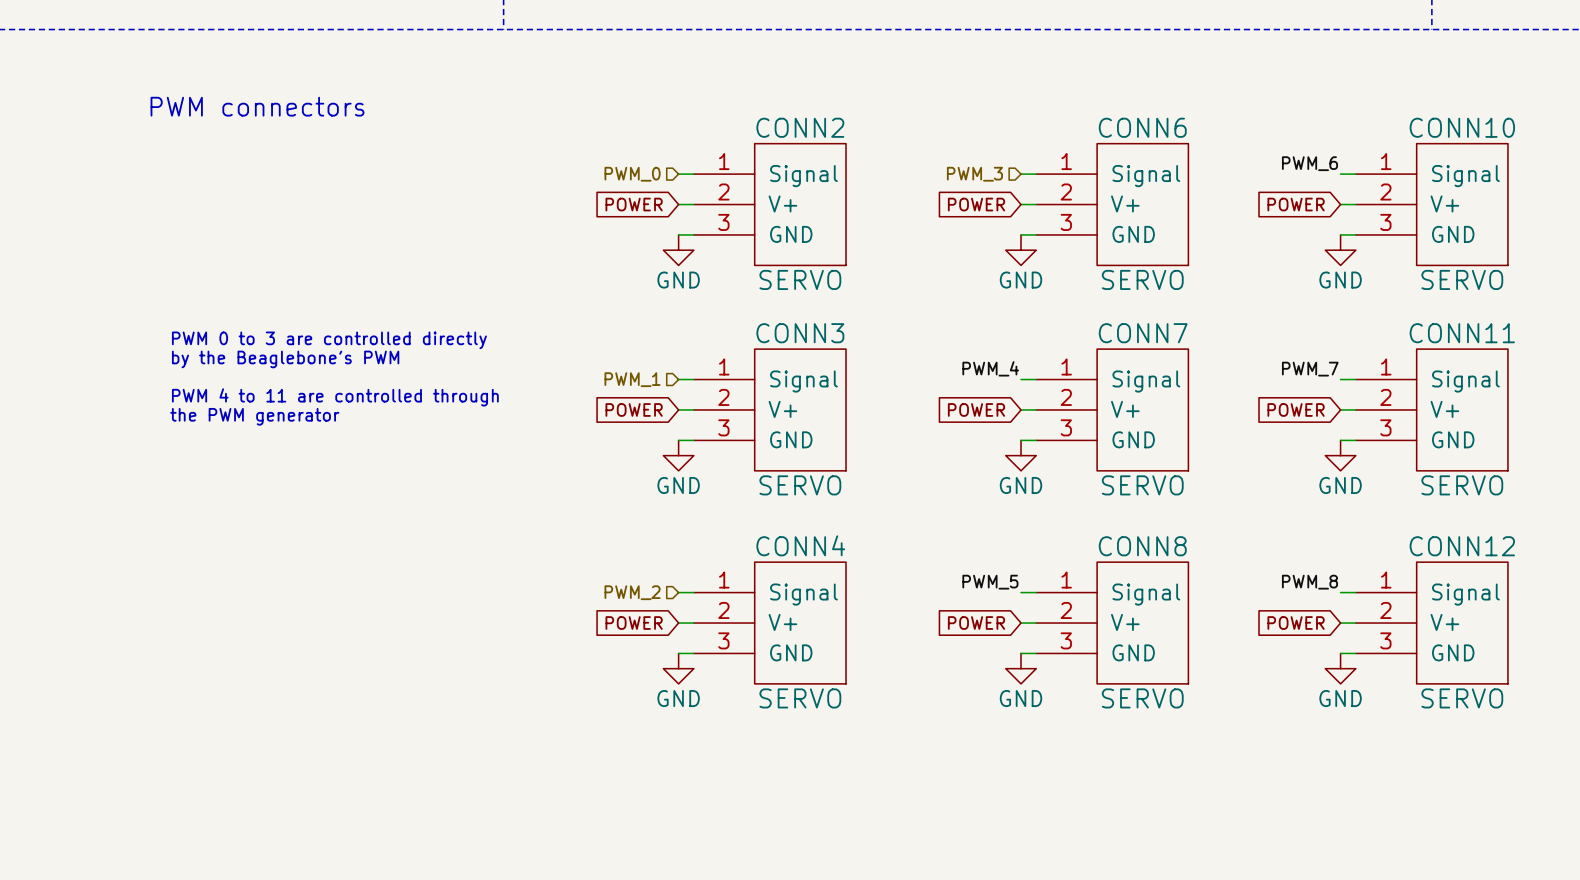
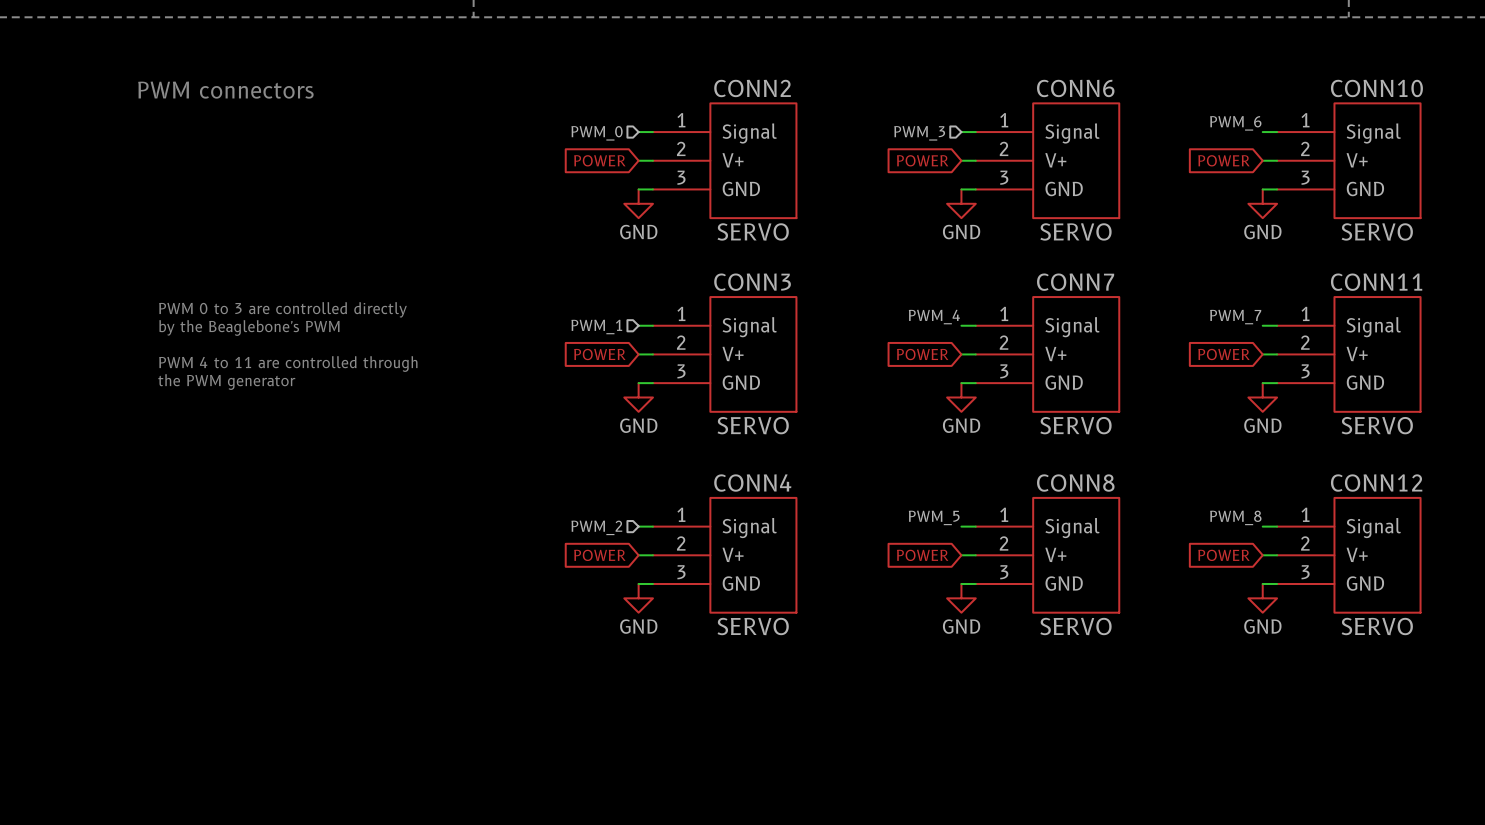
label position: PWM_6 (1309, 163) -> PWM_6 (1235, 123)
hierarchical label position: PWM_0 (632, 174) -> PWM_0 (597, 133)
wire: (678, 174) (693, 174) -> (638, 132) (652, 132)
hierarchical label position: PWM_3 (974, 174) -> PWM_3 (919, 133)
wire: (1021, 174) (1036, 174) -> (961, 132) (975, 132)
wire: (1340, 174) (1355, 174) -> (1262, 132) (1277, 132)
global label position: POWER (634, 204) -> POWER (599, 160)
wire: (678, 204) (693, 204) -> (638, 160) (652, 160)
CONN2 position: (769, 204) -> (724, 160)
global label position: POWER (976, 204) -> POWER (922, 160)
wire: (1021, 204) (1036, 204) -> (961, 160) (975, 160)
CONN6 position: (1112, 204) -> (1047, 160)
global label position: POWER (1296, 204) -> POWER (1223, 160)
wire: (1340, 204) (1355, 204) -> (1262, 160) (1277, 160)
CONN10 position: (1431, 204) -> (1348, 160)
wire: (678, 234) (693, 234) -> (638, 189) (652, 189)
wire: (1021, 234) (1036, 234) -> (961, 189) (975, 189)
wire: (1340, 234) (1355, 234) -> (1262, 189) (1277, 189)
power symbol position: GND (678, 250) -> GND (638, 203)
power symbol position: GND (1021, 250) -> GND (961, 203)
power symbol position: GND (1340, 250) -> GND (1262, 203)
label position: PWM_4 (990, 368) -> PWM_4 (934, 317)
label position: PWM_7 (1310, 369) -> PWM_7 (1235, 317)
hierarchical label position: PWM_1 (632, 379) -> PWM_1 (596, 327)
wire: (678, 379) (693, 379) -> (638, 325) (652, 325)
wire: (1021, 379) (1036, 379) -> (961, 325) (975, 325)
wire: (1340, 379) (1355, 379) -> (1262, 325) (1277, 325)
global label position: POWER (634, 409) -> POWER (599, 354)
wire: (678, 409) (693, 409) -> (638, 354) (652, 354)
CONN3 position: (769, 409) -> (724, 354)
global label position: POWER (976, 409) -> POWER (922, 354)
wire: (1021, 409) (1036, 409) -> (961, 354) (975, 354)
CONN7 position: (1112, 409) -> (1047, 354)
global label position: POWER (1296, 409) -> POWER (1223, 354)
wire: (1340, 409) (1355, 409) -> (1262, 354) (1277, 354)
CONN11 position: (1431, 409) -> (1348, 354)
wire: (678, 440) (693, 440) -> (638, 383) (652, 383)
wire: (1021, 440) (1036, 440) -> (961, 383) (975, 383)
wire: (1340, 440) (1355, 440) -> (1262, 383) (1277, 383)
power symbol position: GND (678, 455) -> GND (638, 397)
power symbol position: GND (1021, 455) -> GND (961, 397)
power symbol position: GND (1340, 455) -> GND (1262, 397)
label position: PWM_5 (990, 582) -> PWM_5 (934, 517)
label position: PWM_8 (1309, 582) -> PWM_8 (1235, 517)
hierarchical label position: PWM_2 (632, 592) -> PWM_2 (596, 527)
wire: (678, 592) (693, 592) -> (638, 526) (652, 526)
wire: (1021, 592) (1036, 592) -> (961, 526) (975, 526)
wire: (1340, 592) (1355, 592) -> (1262, 526) (1277, 526)
global label position: POWER (634, 623) -> POWER (599, 555)
wire: (678, 623) (693, 623) -> (638, 555) (652, 555)
CONN4 position: (769, 623) -> (724, 555)
global label position: POWER (976, 623) -> POWER (922, 555)
wire: (1021, 623) (1036, 623) -> (961, 555) (975, 555)
CONN8 position: (1112, 623) -> (1047, 555)
global label position: POWER (1296, 623) -> POWER (1223, 555)
wire: (1340, 623) (1355, 623) -> (1262, 555) (1277, 555)
CONN12 position: (1431, 623) -> (1348, 555)
wire: (678, 653) (693, 653) -> (638, 583) (652, 583)
wire: (1021, 653) (1036, 653) -> (961, 583) (975, 583)
wire: (1340, 653) (1355, 653) -> (1262, 583) (1277, 583)
power symbol position: GND (678, 668) -> GND (638, 598)
power symbol position: GND (1021, 668) -> GND (961, 598)
power symbol position: GND (1340, 668) -> GND (1262, 598)

